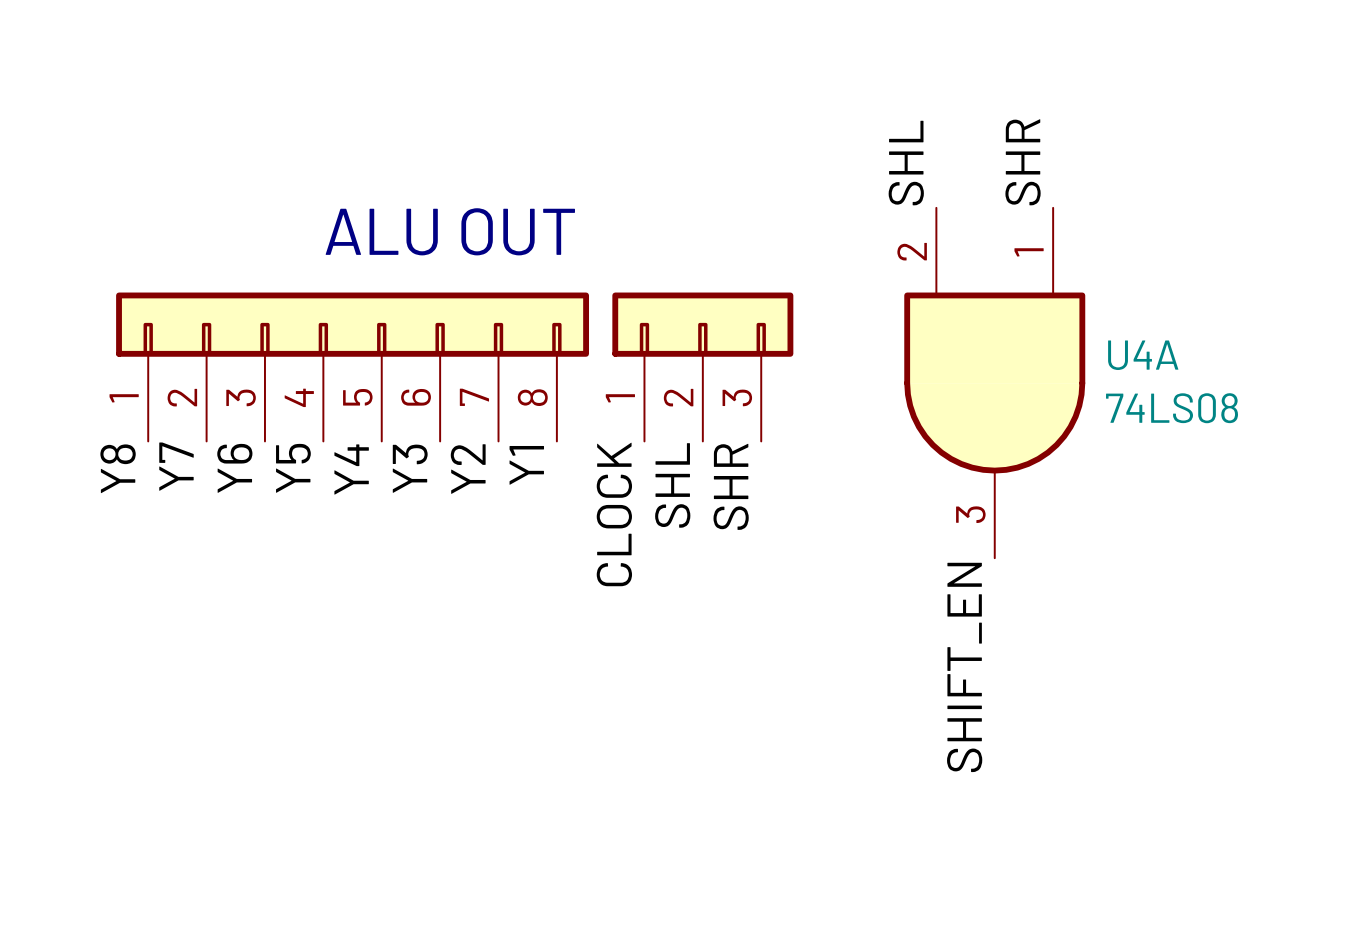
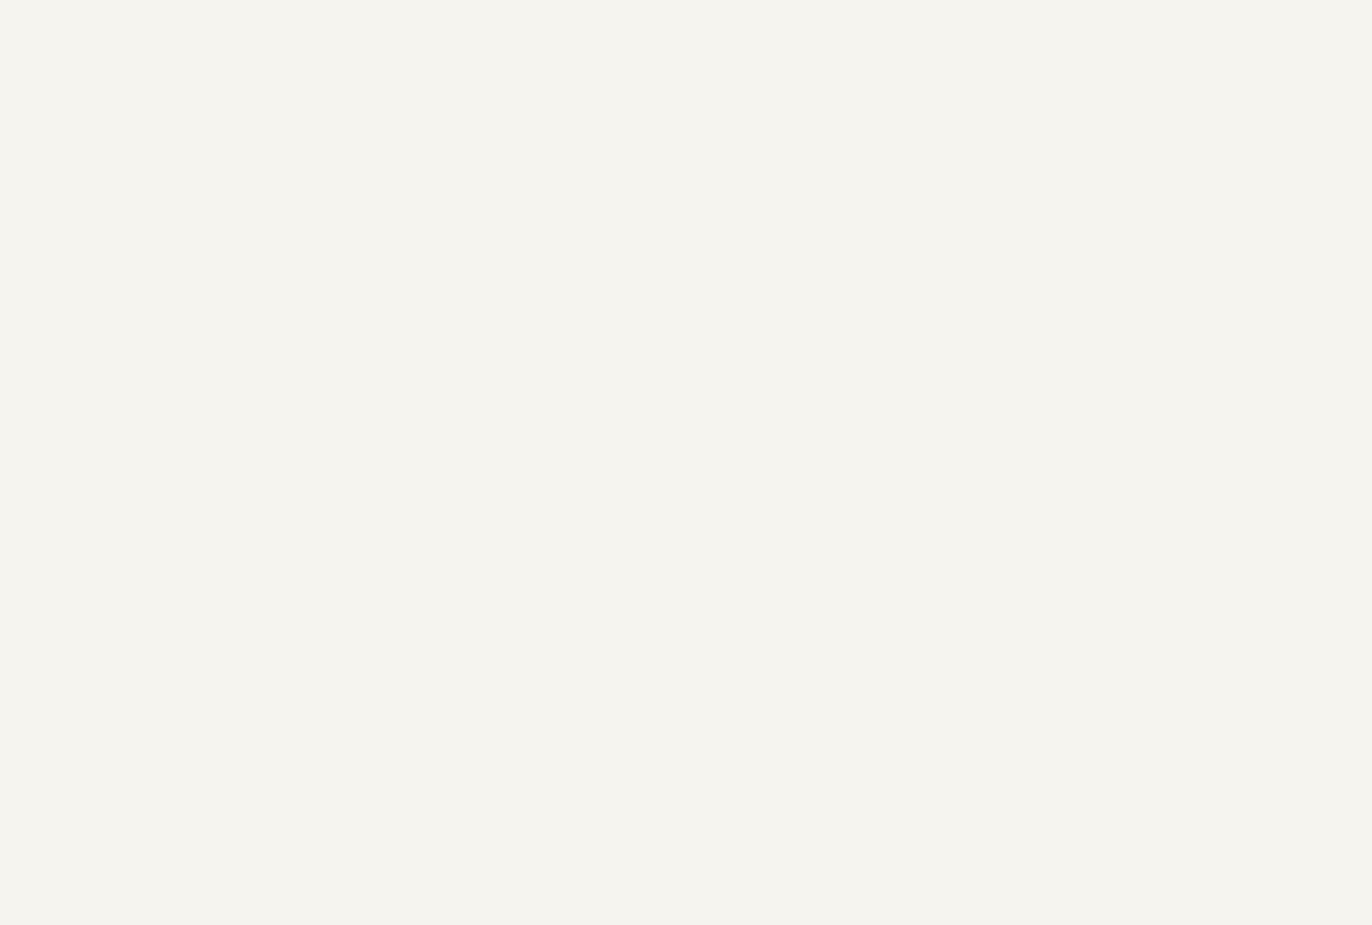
label: SHR (1023, 162) -> none
label: SHL (906, 163) -> none
text: ALU OUT (450, 231) -> none
part: (352, 366) -> none
part: (702, 366) -> none
U4A: 74LS08 (994, 383) -> none
label: Y1 (526, 465) -> none
label: Y7 (176, 466) -> none
label: Y8 (118, 468) -> none
label: Y6 (234, 468) -> none
label: Y5 (293, 468) -> none
label: Y3 (410, 468) -> none
label: Y4 (351, 469) -> none
label: Y2 (468, 469) -> none
label: SHL (672, 485) -> none
label: SHR (731, 486) -> none
label: CLOCK (614, 514) -> none
label: SHIFT_EN (964, 667) -> none

